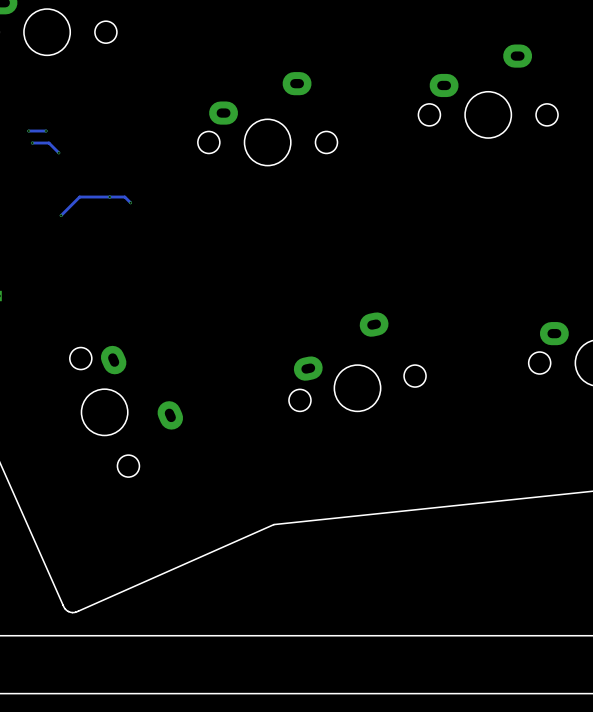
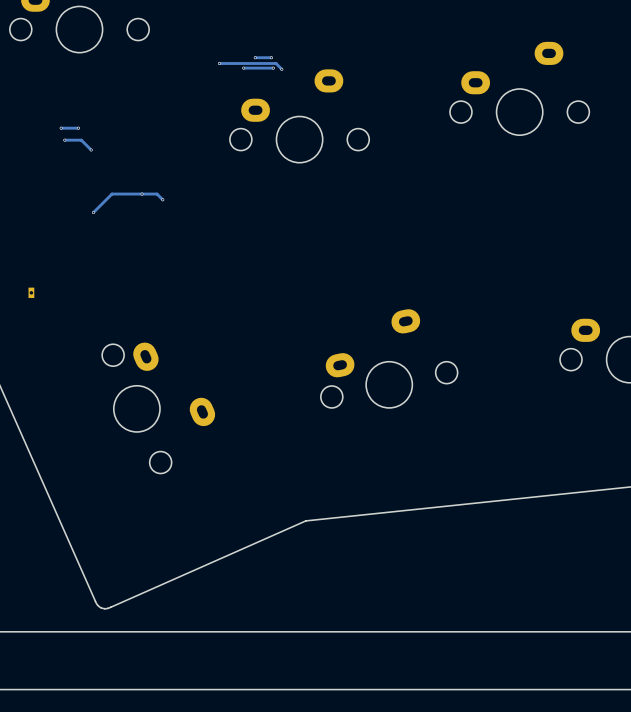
via: none -> (255, 57)
track: none -> (271, 57) (255, 57)
via: none -> (271, 57)
track: none -> (219, 63) (276, 63) (281, 69)
via: none -> (219, 63)
via: none -> (243, 68)
track: none -> (273, 68) (243, 68)
via: none -> (273, 68)
via: none -> (281, 69)

